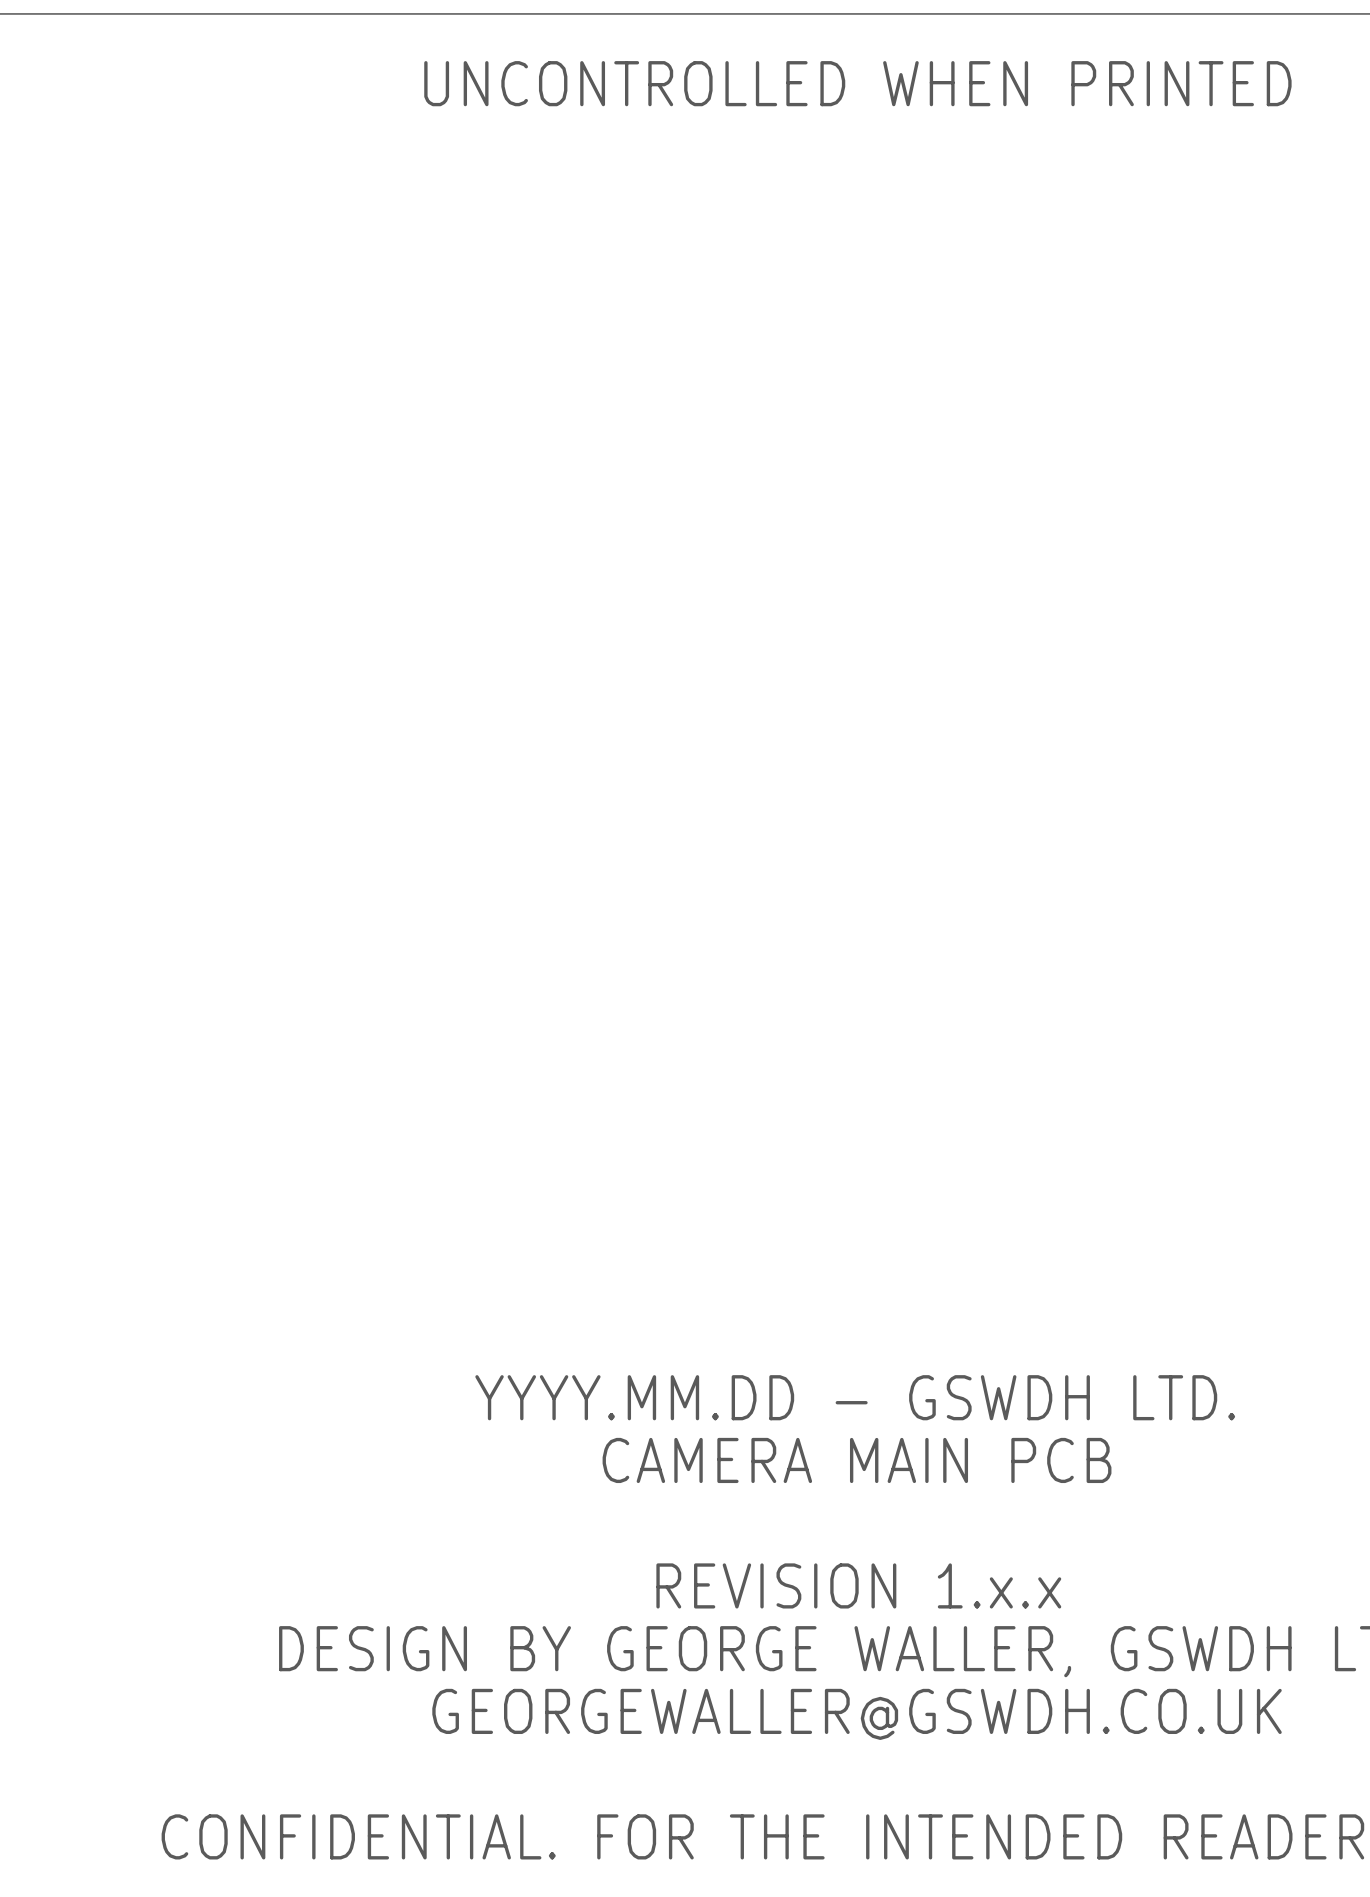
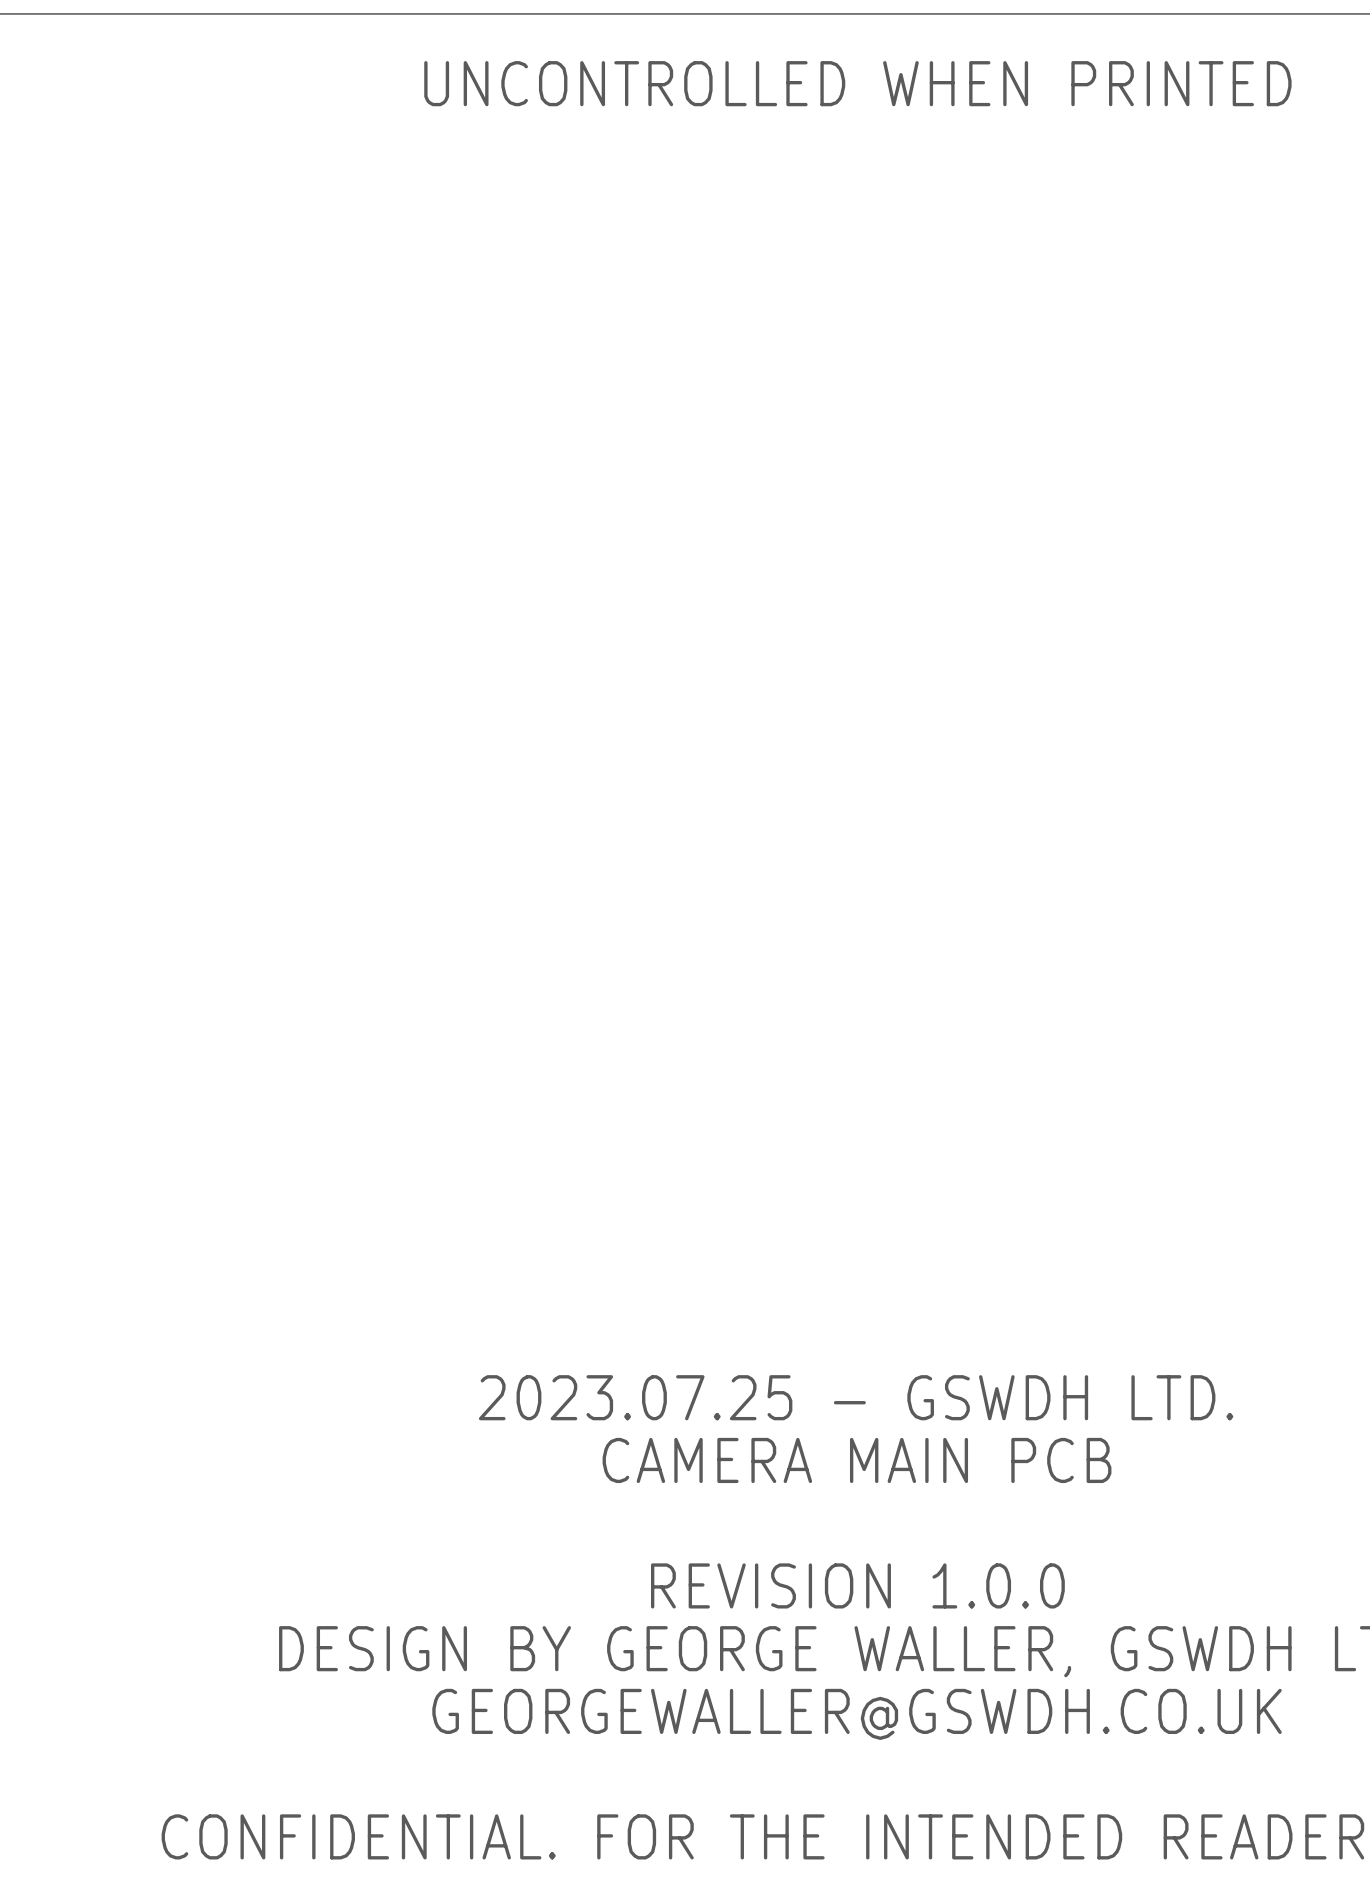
text: YYYY.MM.DD - GSWDH LTD. (855, 1397) -> 2023.07.25 - GSWDH LTD. (856, 1397)
text: REVISION 1.x.x (858, 1585) -> REVISION 1.0.0 (857, 1585)

